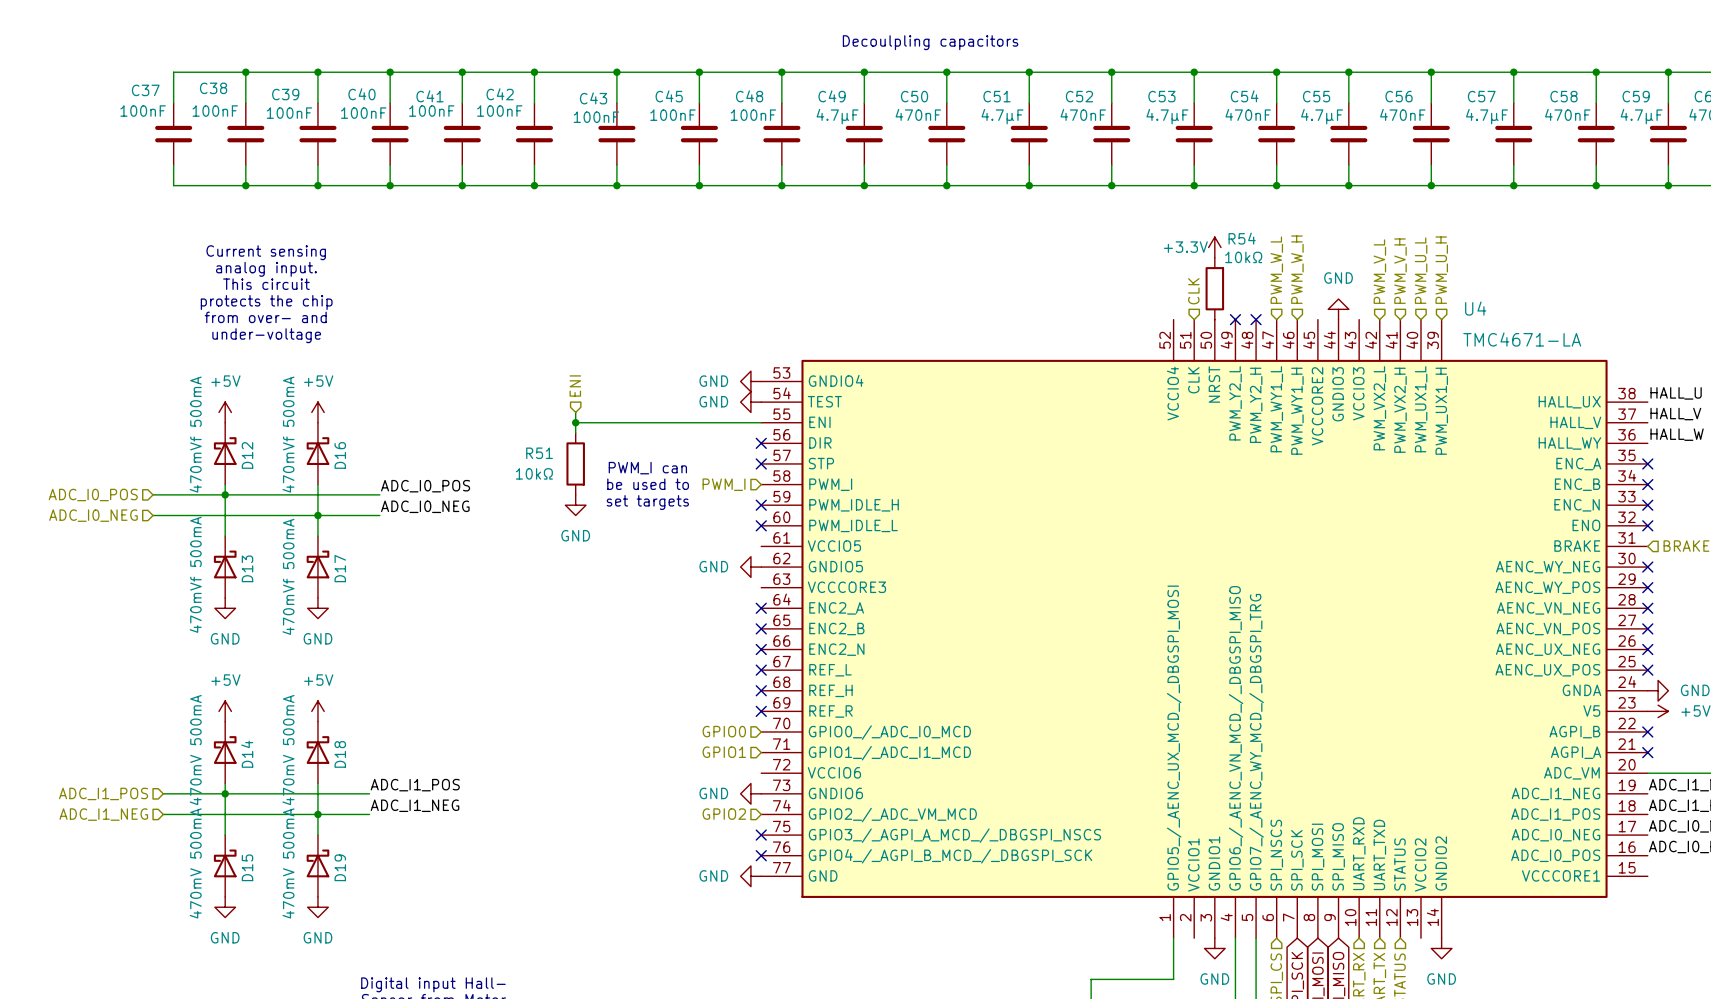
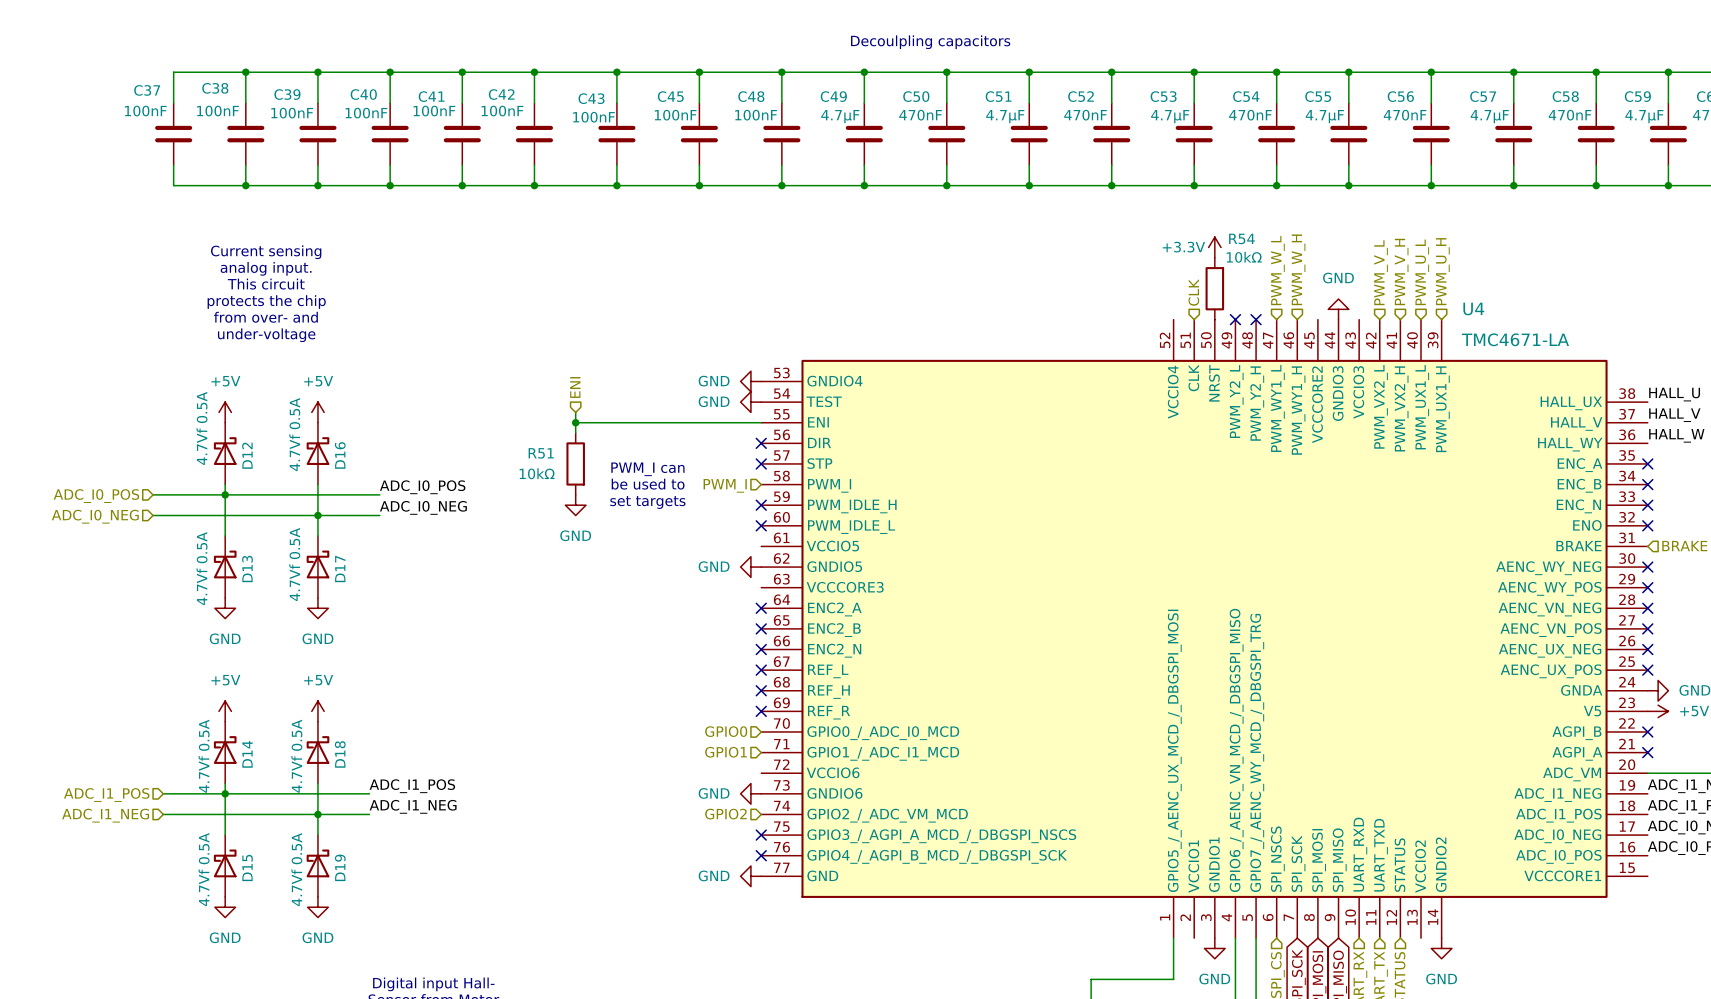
D12 value: 470mVf 500mA (195, 434) -> 4.7Vf 0.5A (202, 428)
D16 value: 470mVf 500mA (288, 434) -> 4.7Vf 0.5A (294, 434)
D13 value: 470mVf 500mA (195, 574) -> 4.7Vf 0.5A (202, 568)
D17 value: 470mVf 500mA (288, 576) -> 4.7Vf 0.5A (294, 564)
D14 value: 470mV 500mA (195, 750) -> 4.7Vf 0.5A (204, 756)
D18 value: 470mV 500mA (288, 750) -> 4.7Vf 0.5A (296, 756)
D15 value: 470mV 500mA (195, 863) -> 4.7Vf 0.5A (204, 869)
D19 value: 470mV 500mA (288, 863) -> 4.7Vf 0.5A (296, 869)

